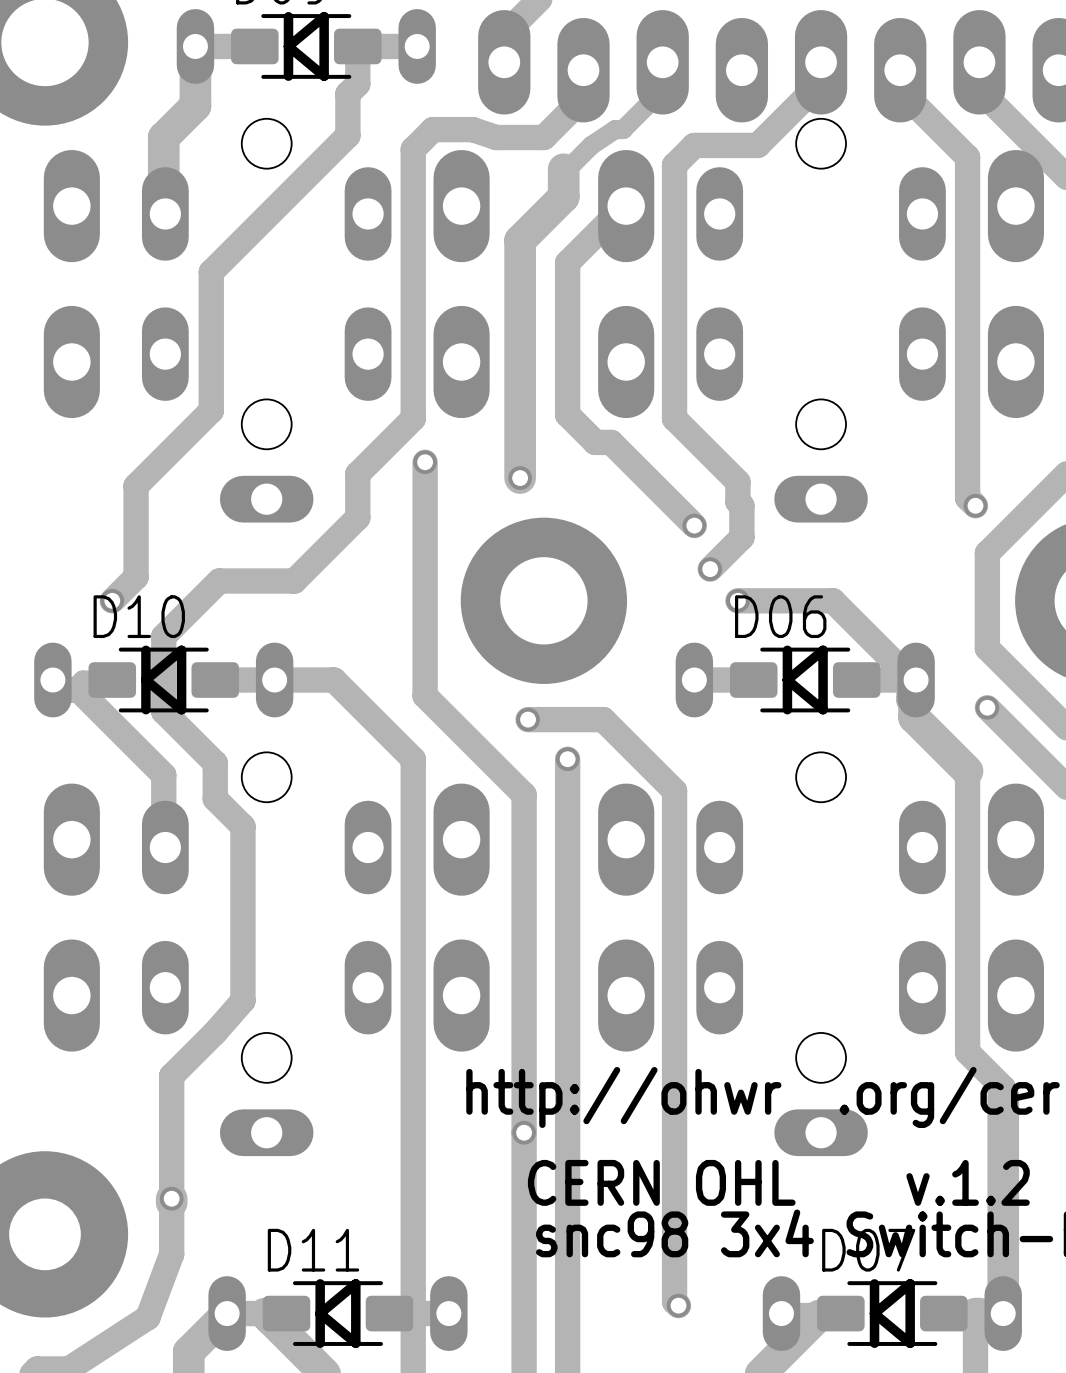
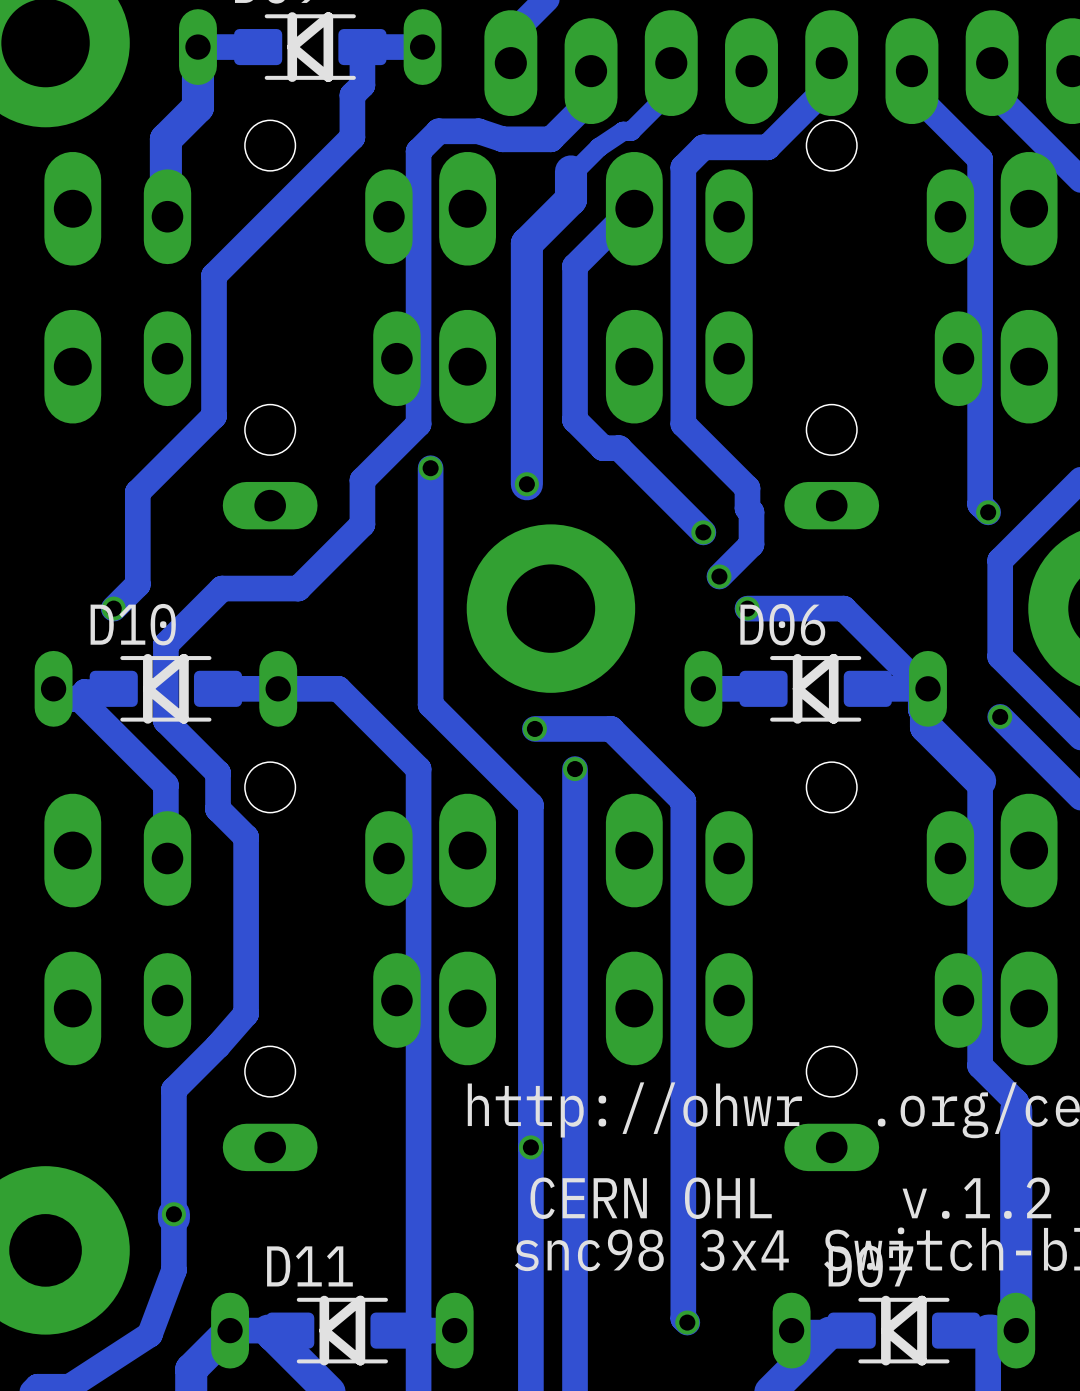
part footprint: [43, 118, 490, 523] -> [44, 120, 496, 530]
part footprint: [598, 118, 1045, 523] -> [605, 120, 1058, 530]
part footprint: [43, 752, 490, 1157] -> [44, 762, 496, 1172]
part footprint: [598, 752, 1045, 1157] -> [605, 762, 1058, 1172]

